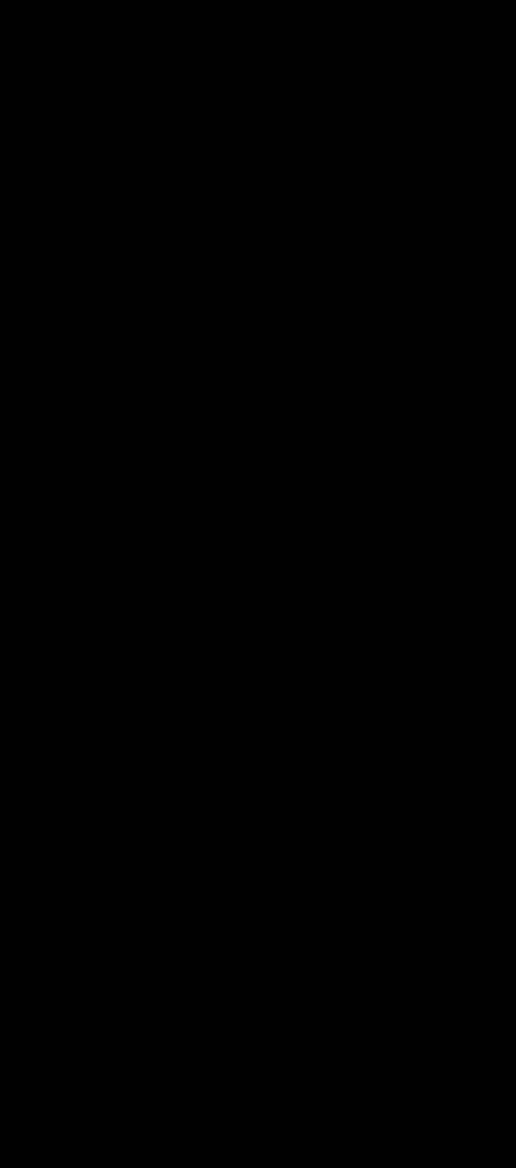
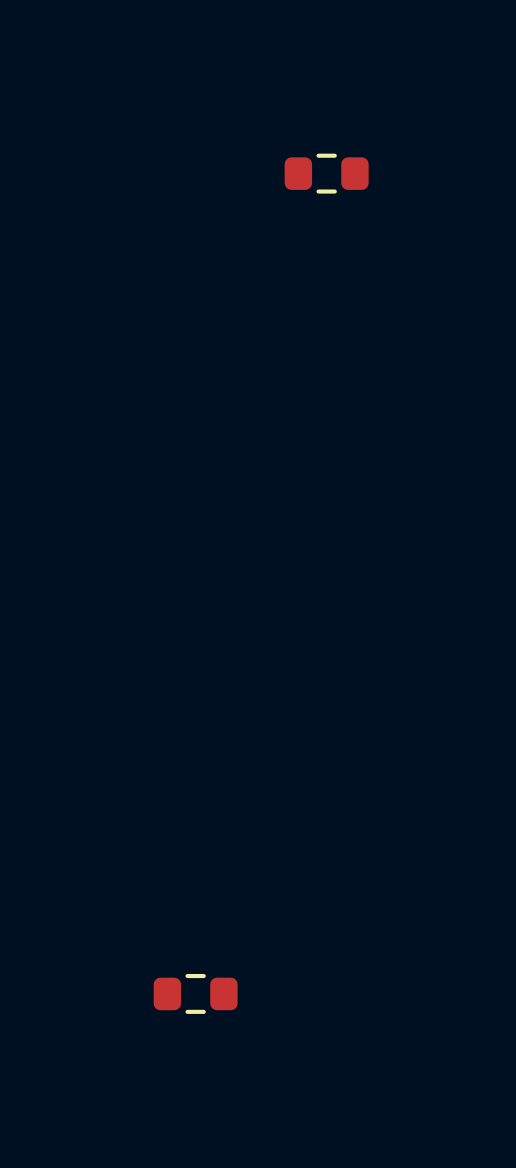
part: none -> (326, 173)
part: none -> (195, 993)

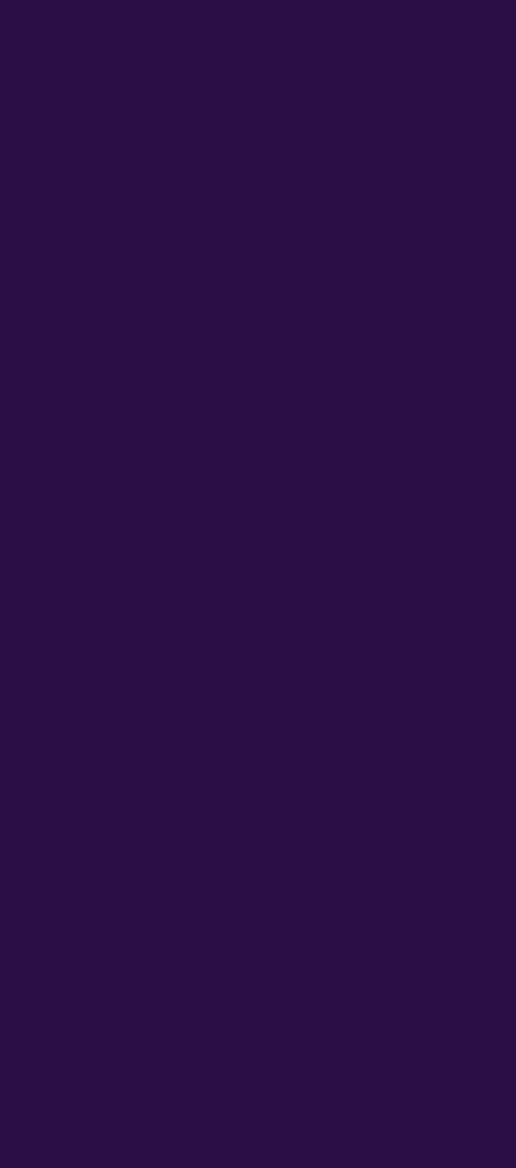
part: (326, 173) -> none
part: (195, 993) -> none

